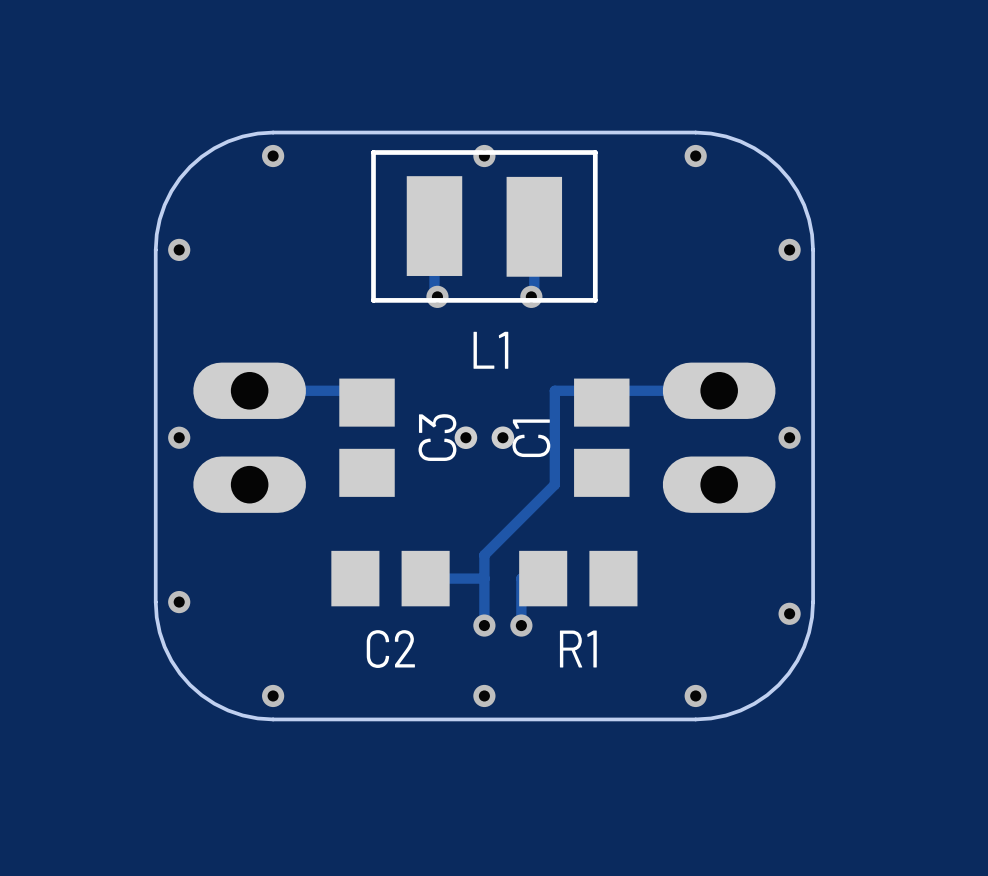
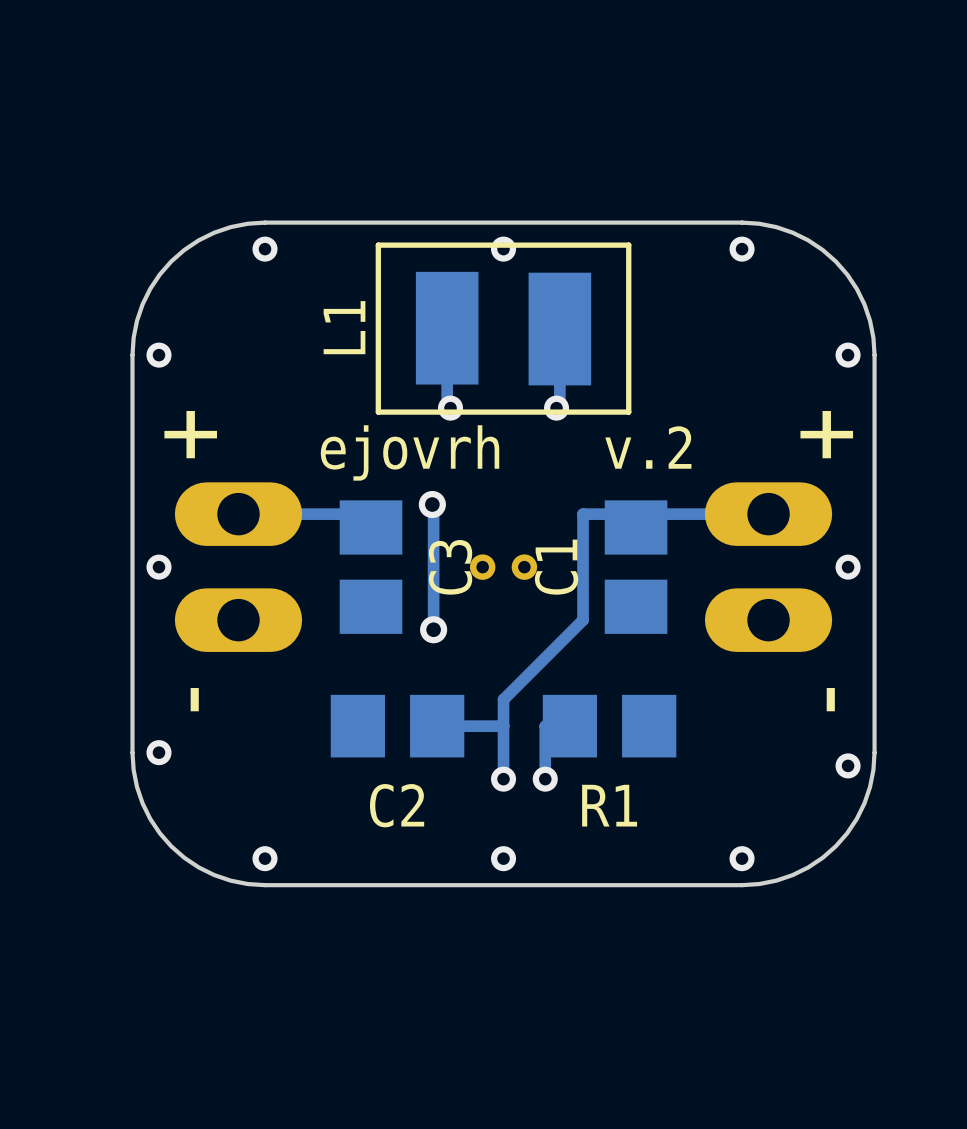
text: none -> + (190, 434)
text: none -> + (826, 434)
text: none -> v.2 (648, 447)
text: none -> ejovrh (410, 452)
L1 name rotation: 0° (490, 350) -> 90° counterclockwise (344, 327)
L1 name position: L1 (490, 350) -> L1 (344, 327)
track: none -> (432, 504) (433, 629)
via: none -> (432, 504)
via: none -> (433, 629)
text: none -> - (194, 699)
text: none -> - (830, 699)

